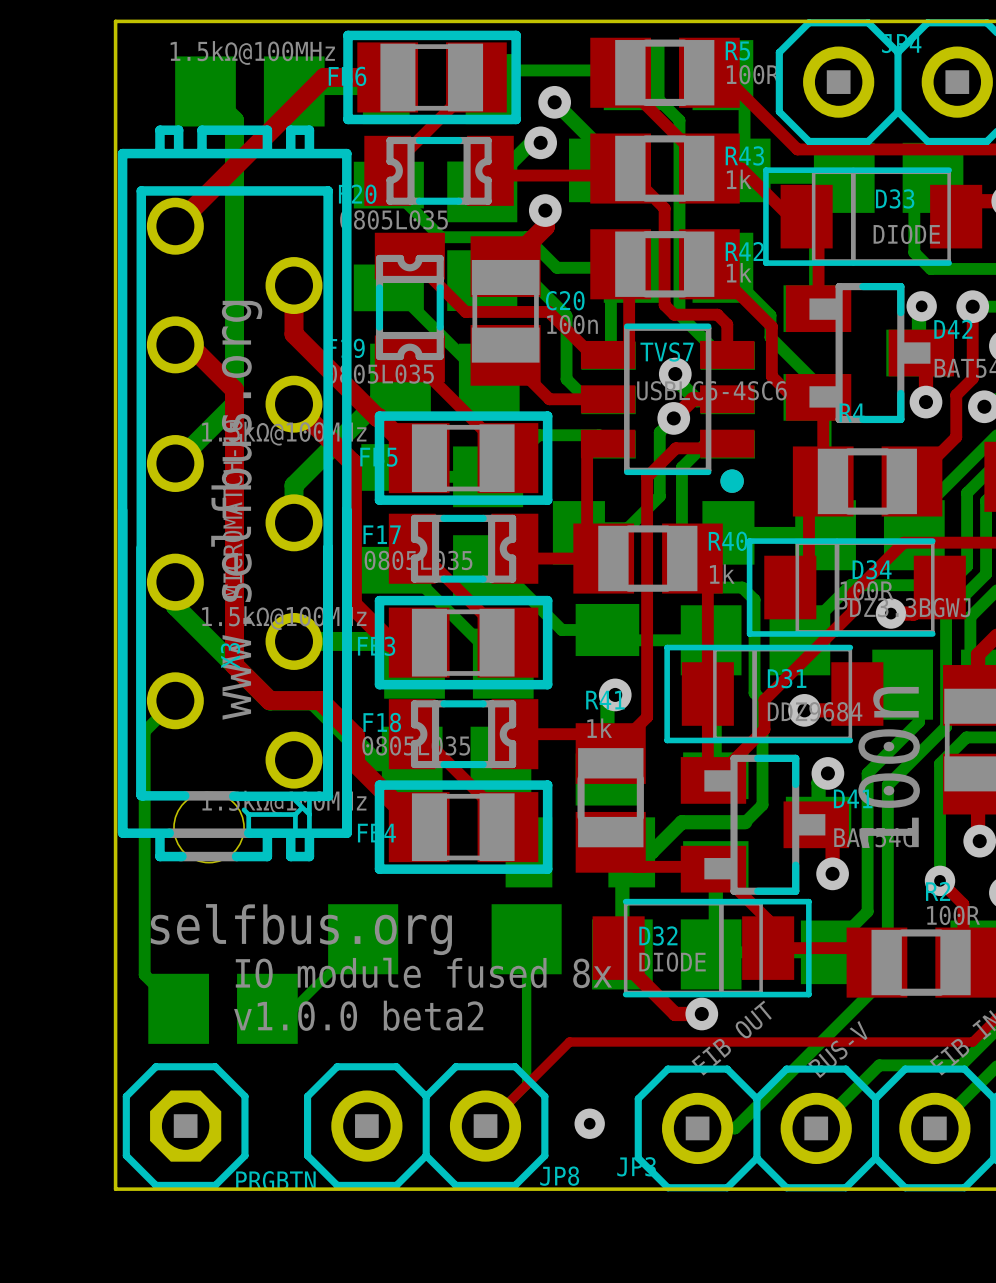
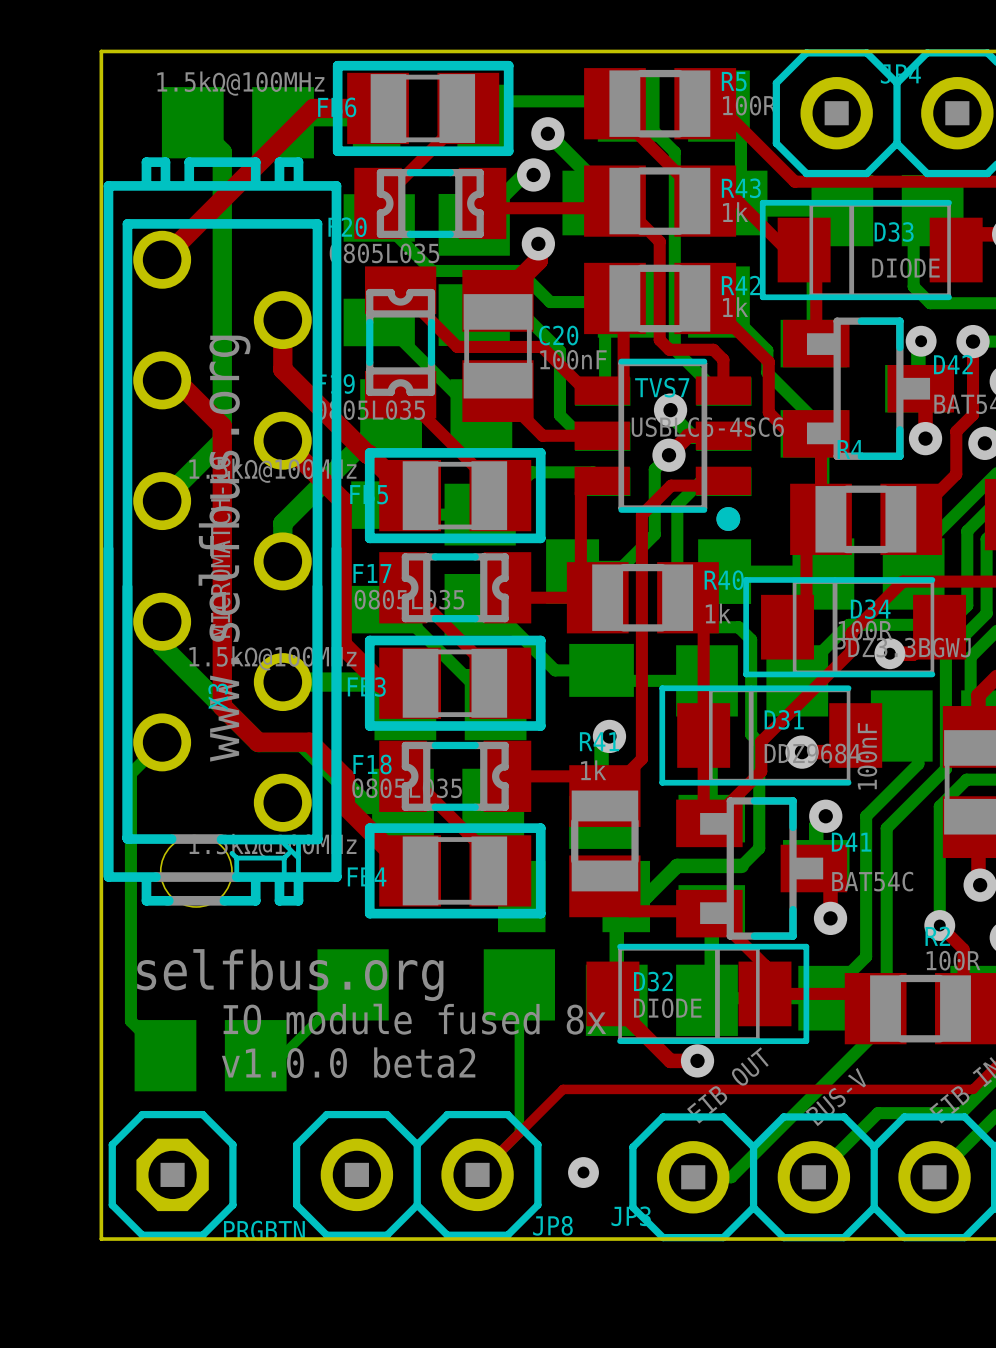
C20 value: 100n (572, 324) -> 100nF (573, 359)
part value: 100n (889, 767) -> 100nF (867, 756)

